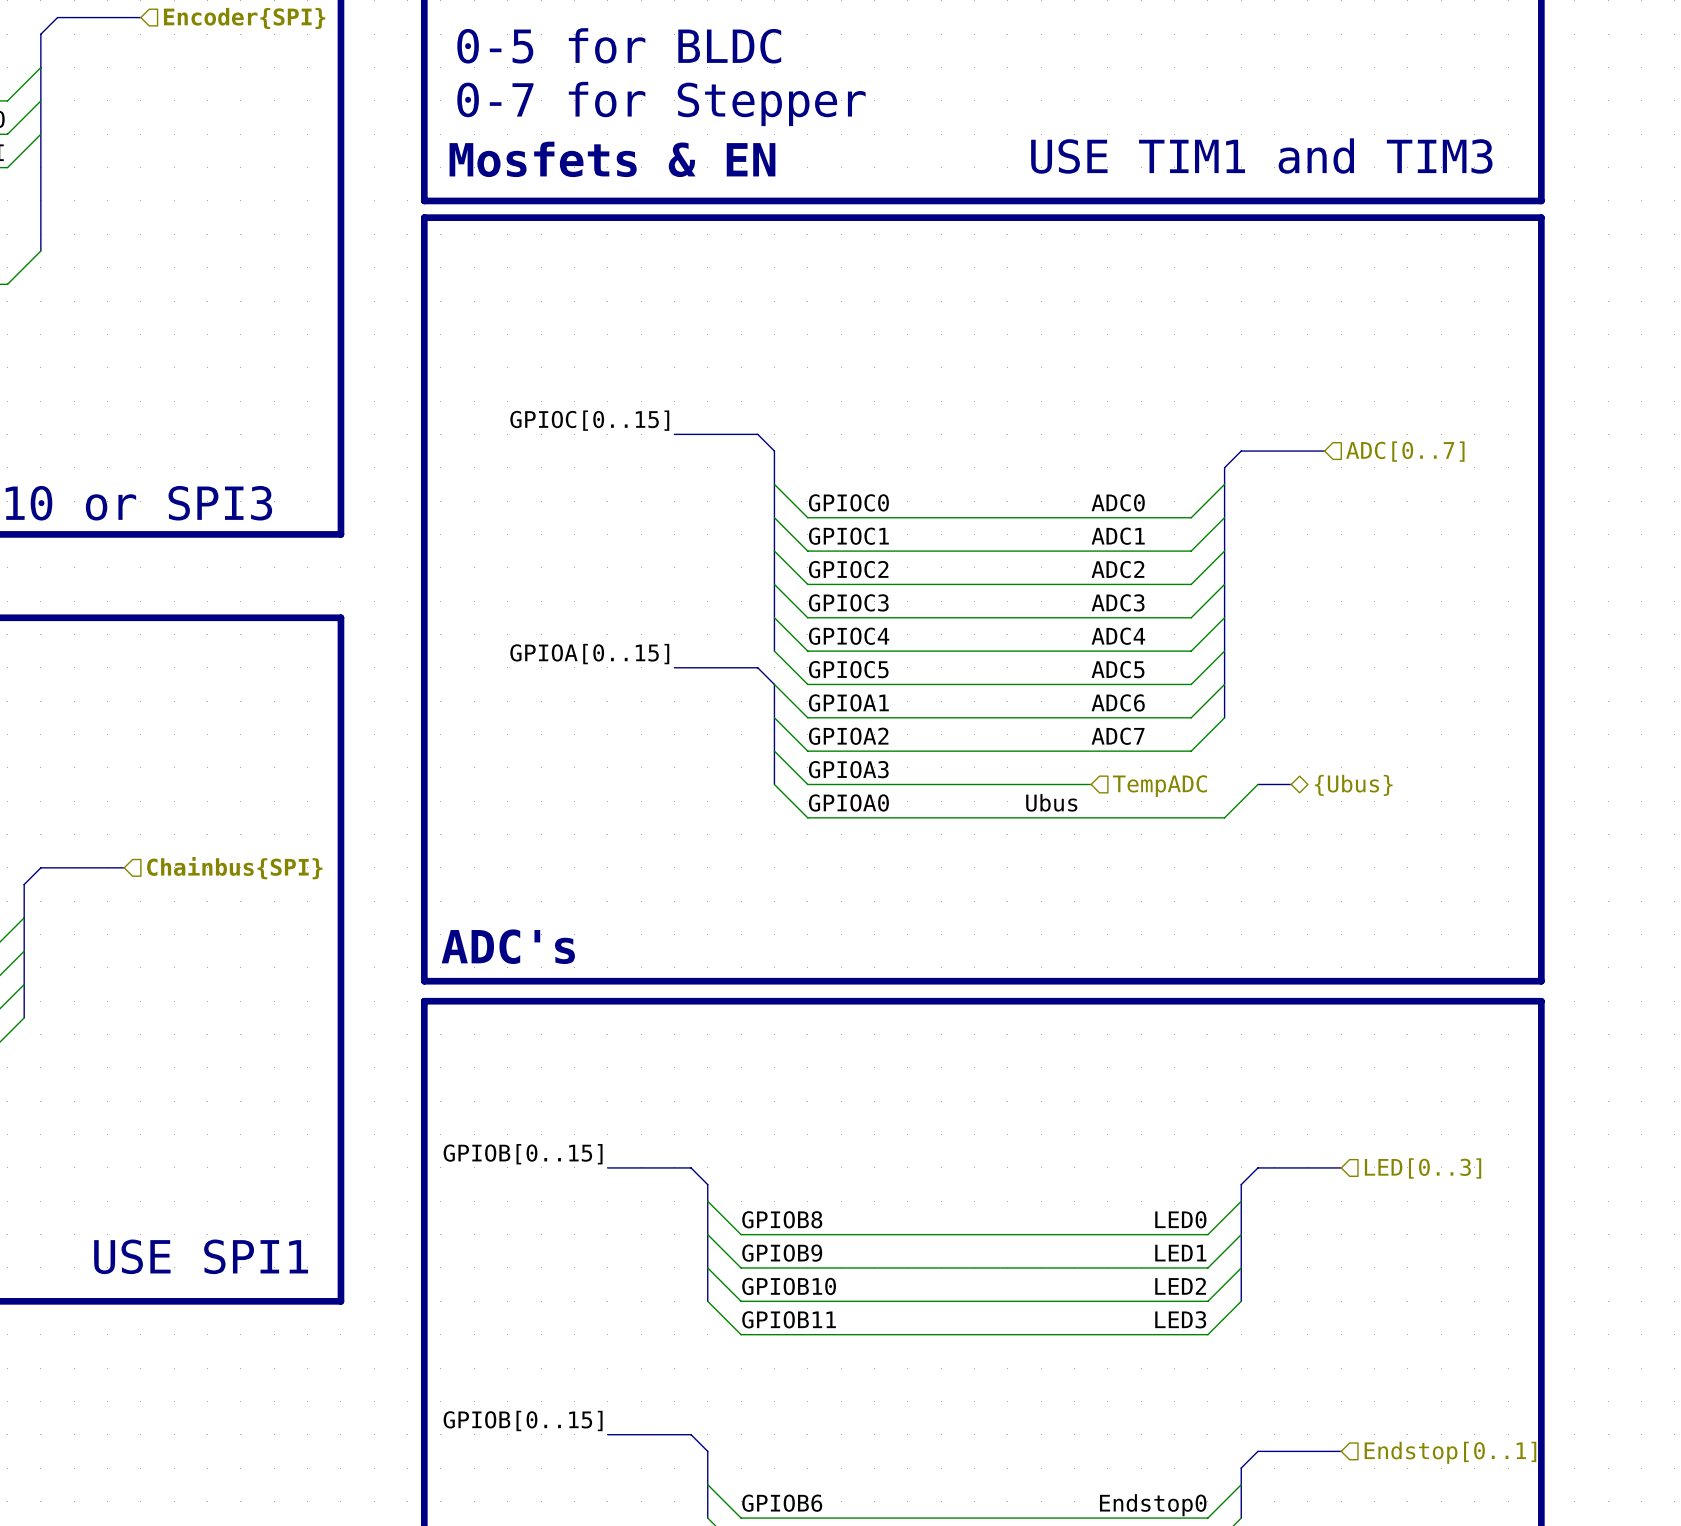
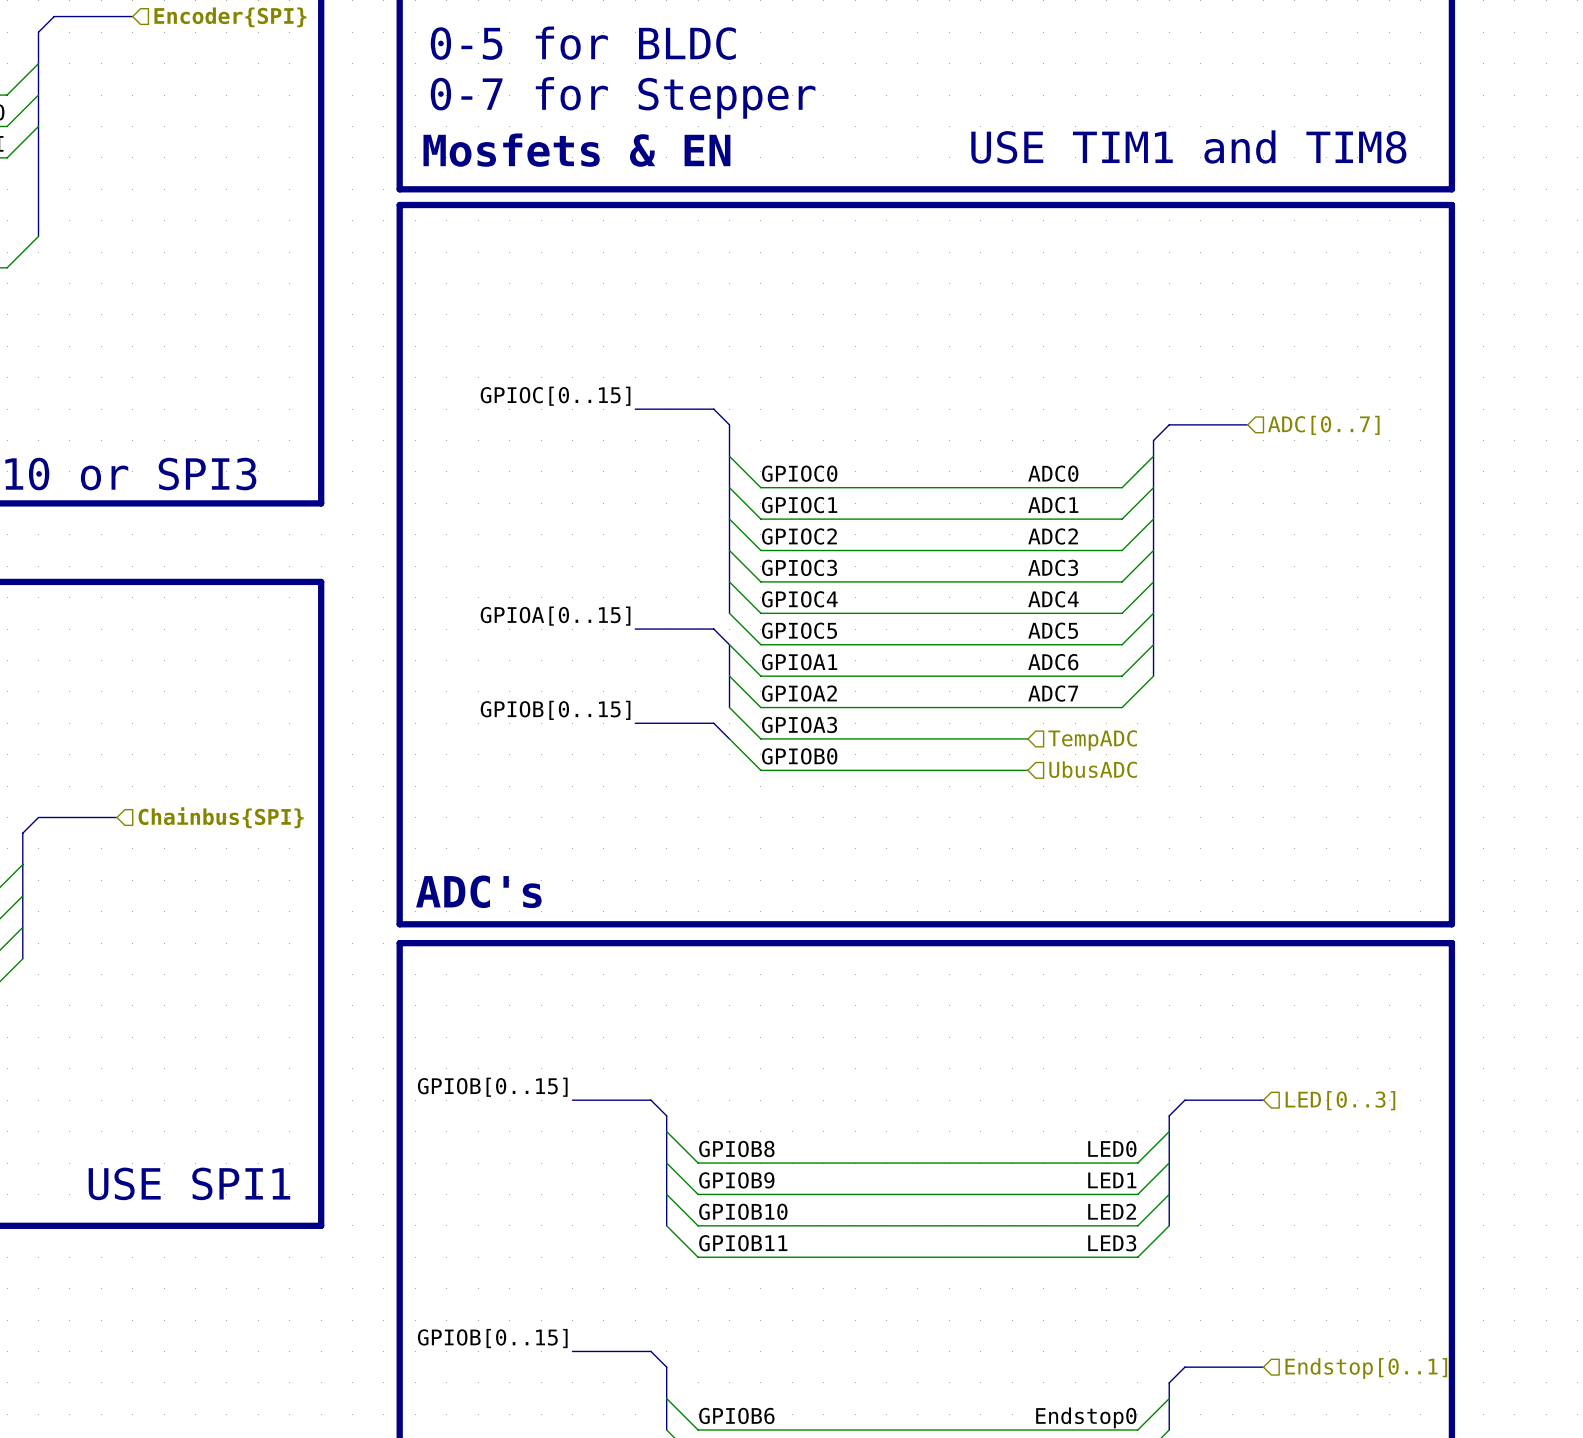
text: USE TIM1 and TIM3 (1261, 156) -> USE TIM1 and TIM8 (1188, 146)
bus: (774, 751) (774, 784) -> (635, 723) (713, 723) (729, 738)
label: none -> GPIOB[0..15] (555, 710)
wire: (1257, 784) (1224, 817) (1091, 817) -> none
bus: (1257, 784) (1291, 784) -> none
hierarchical label: {Ubus} (1353, 785) -> none
label: GPIOA0 (848, 802) -> GPIOB0 (799, 756)
label: Ubus (1051, 802) -> none
hierarchical label: none -> UbusADC (1093, 769)

